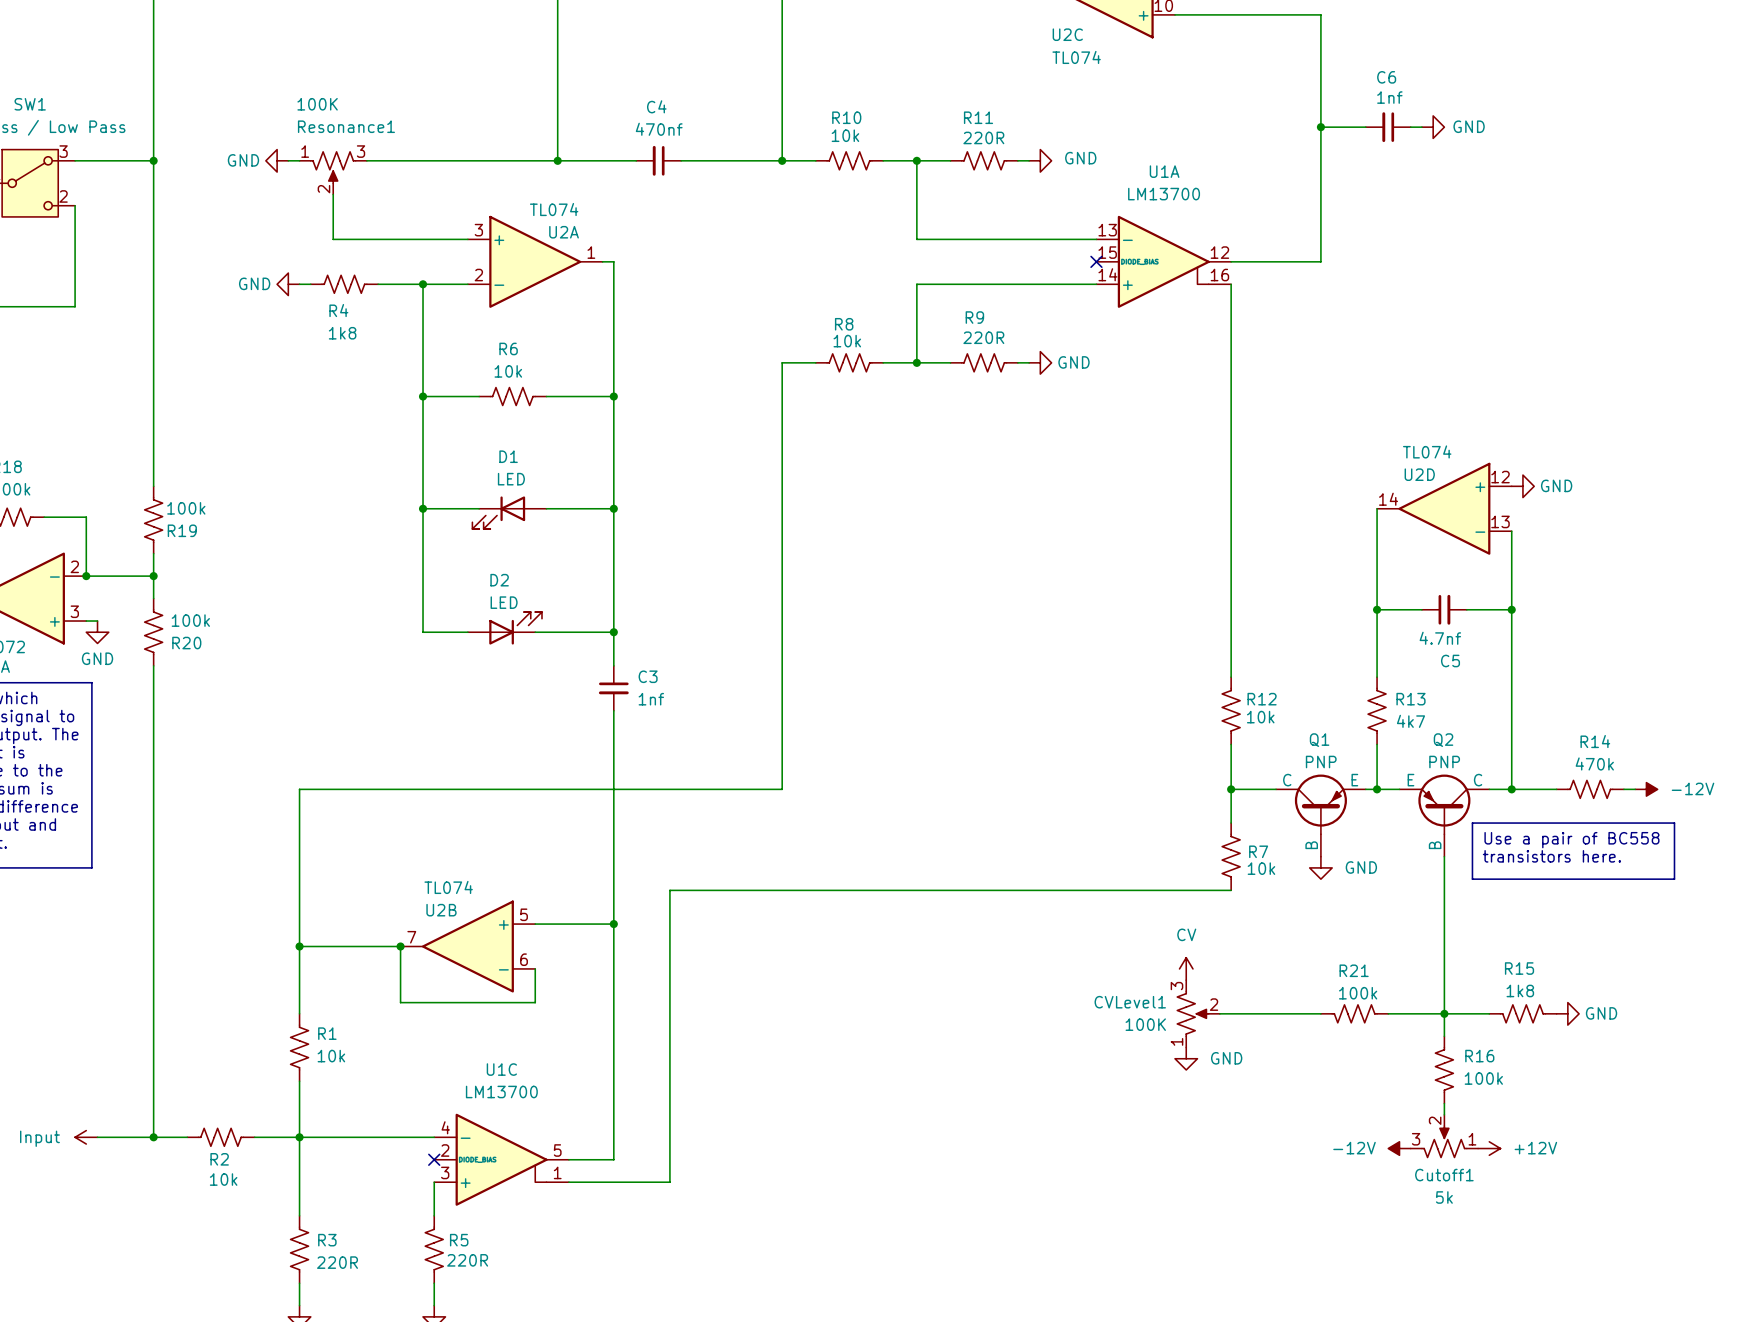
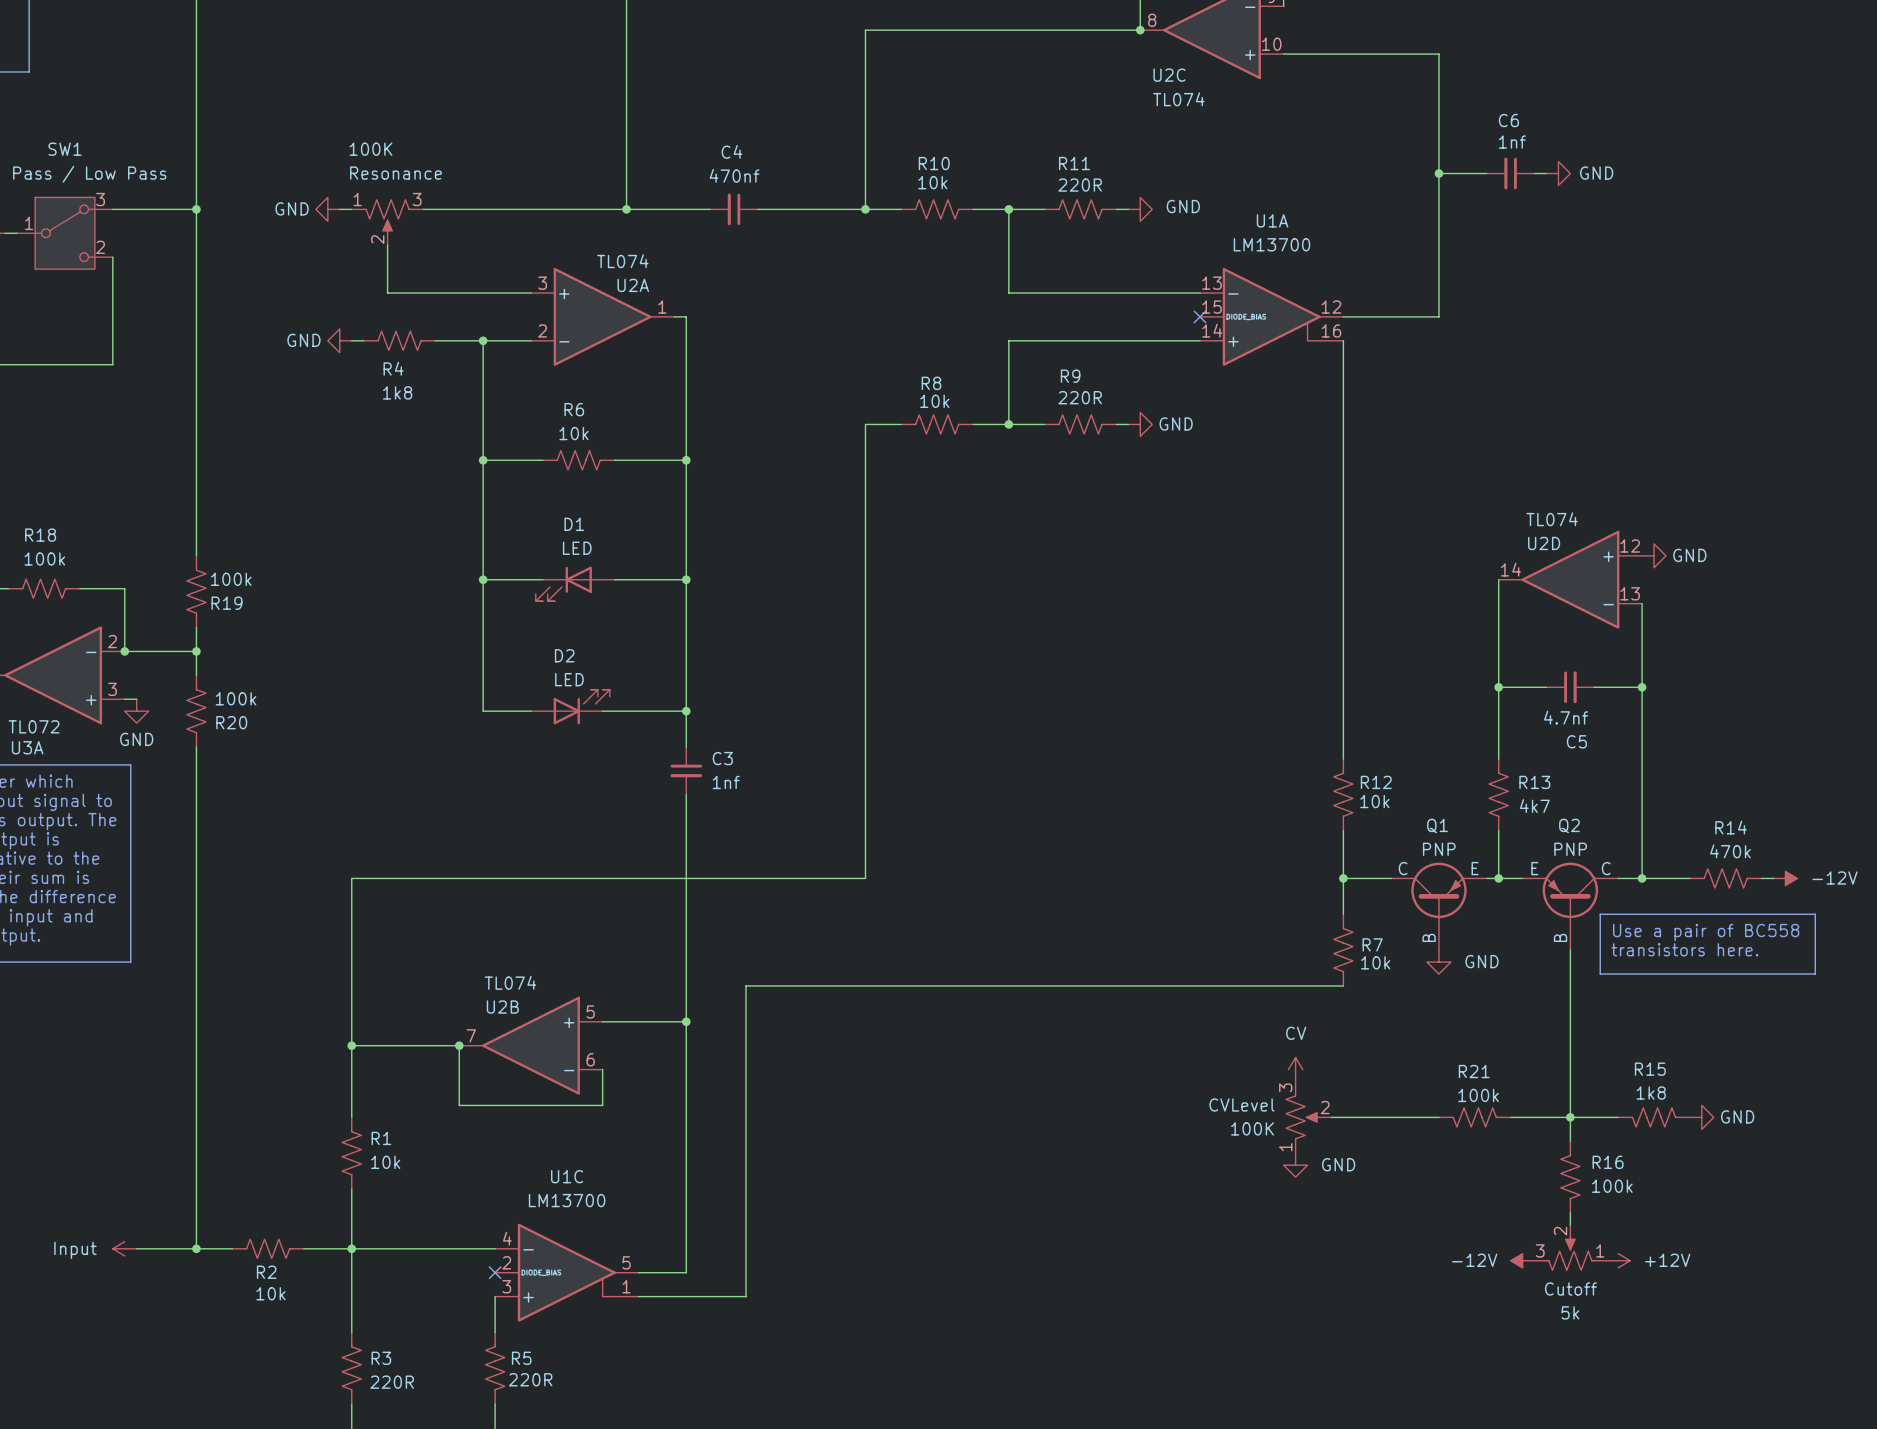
Resonance1 name: Resonance1 (346, 126) -> Resonance (395, 173)
CVLevel1 name: CVLevel1 (1130, 1002) -> CVLevel (1241, 1104)
Cutoff1 name: Cutoff1 (1444, 1175) -> Cutoff (1570, 1288)

